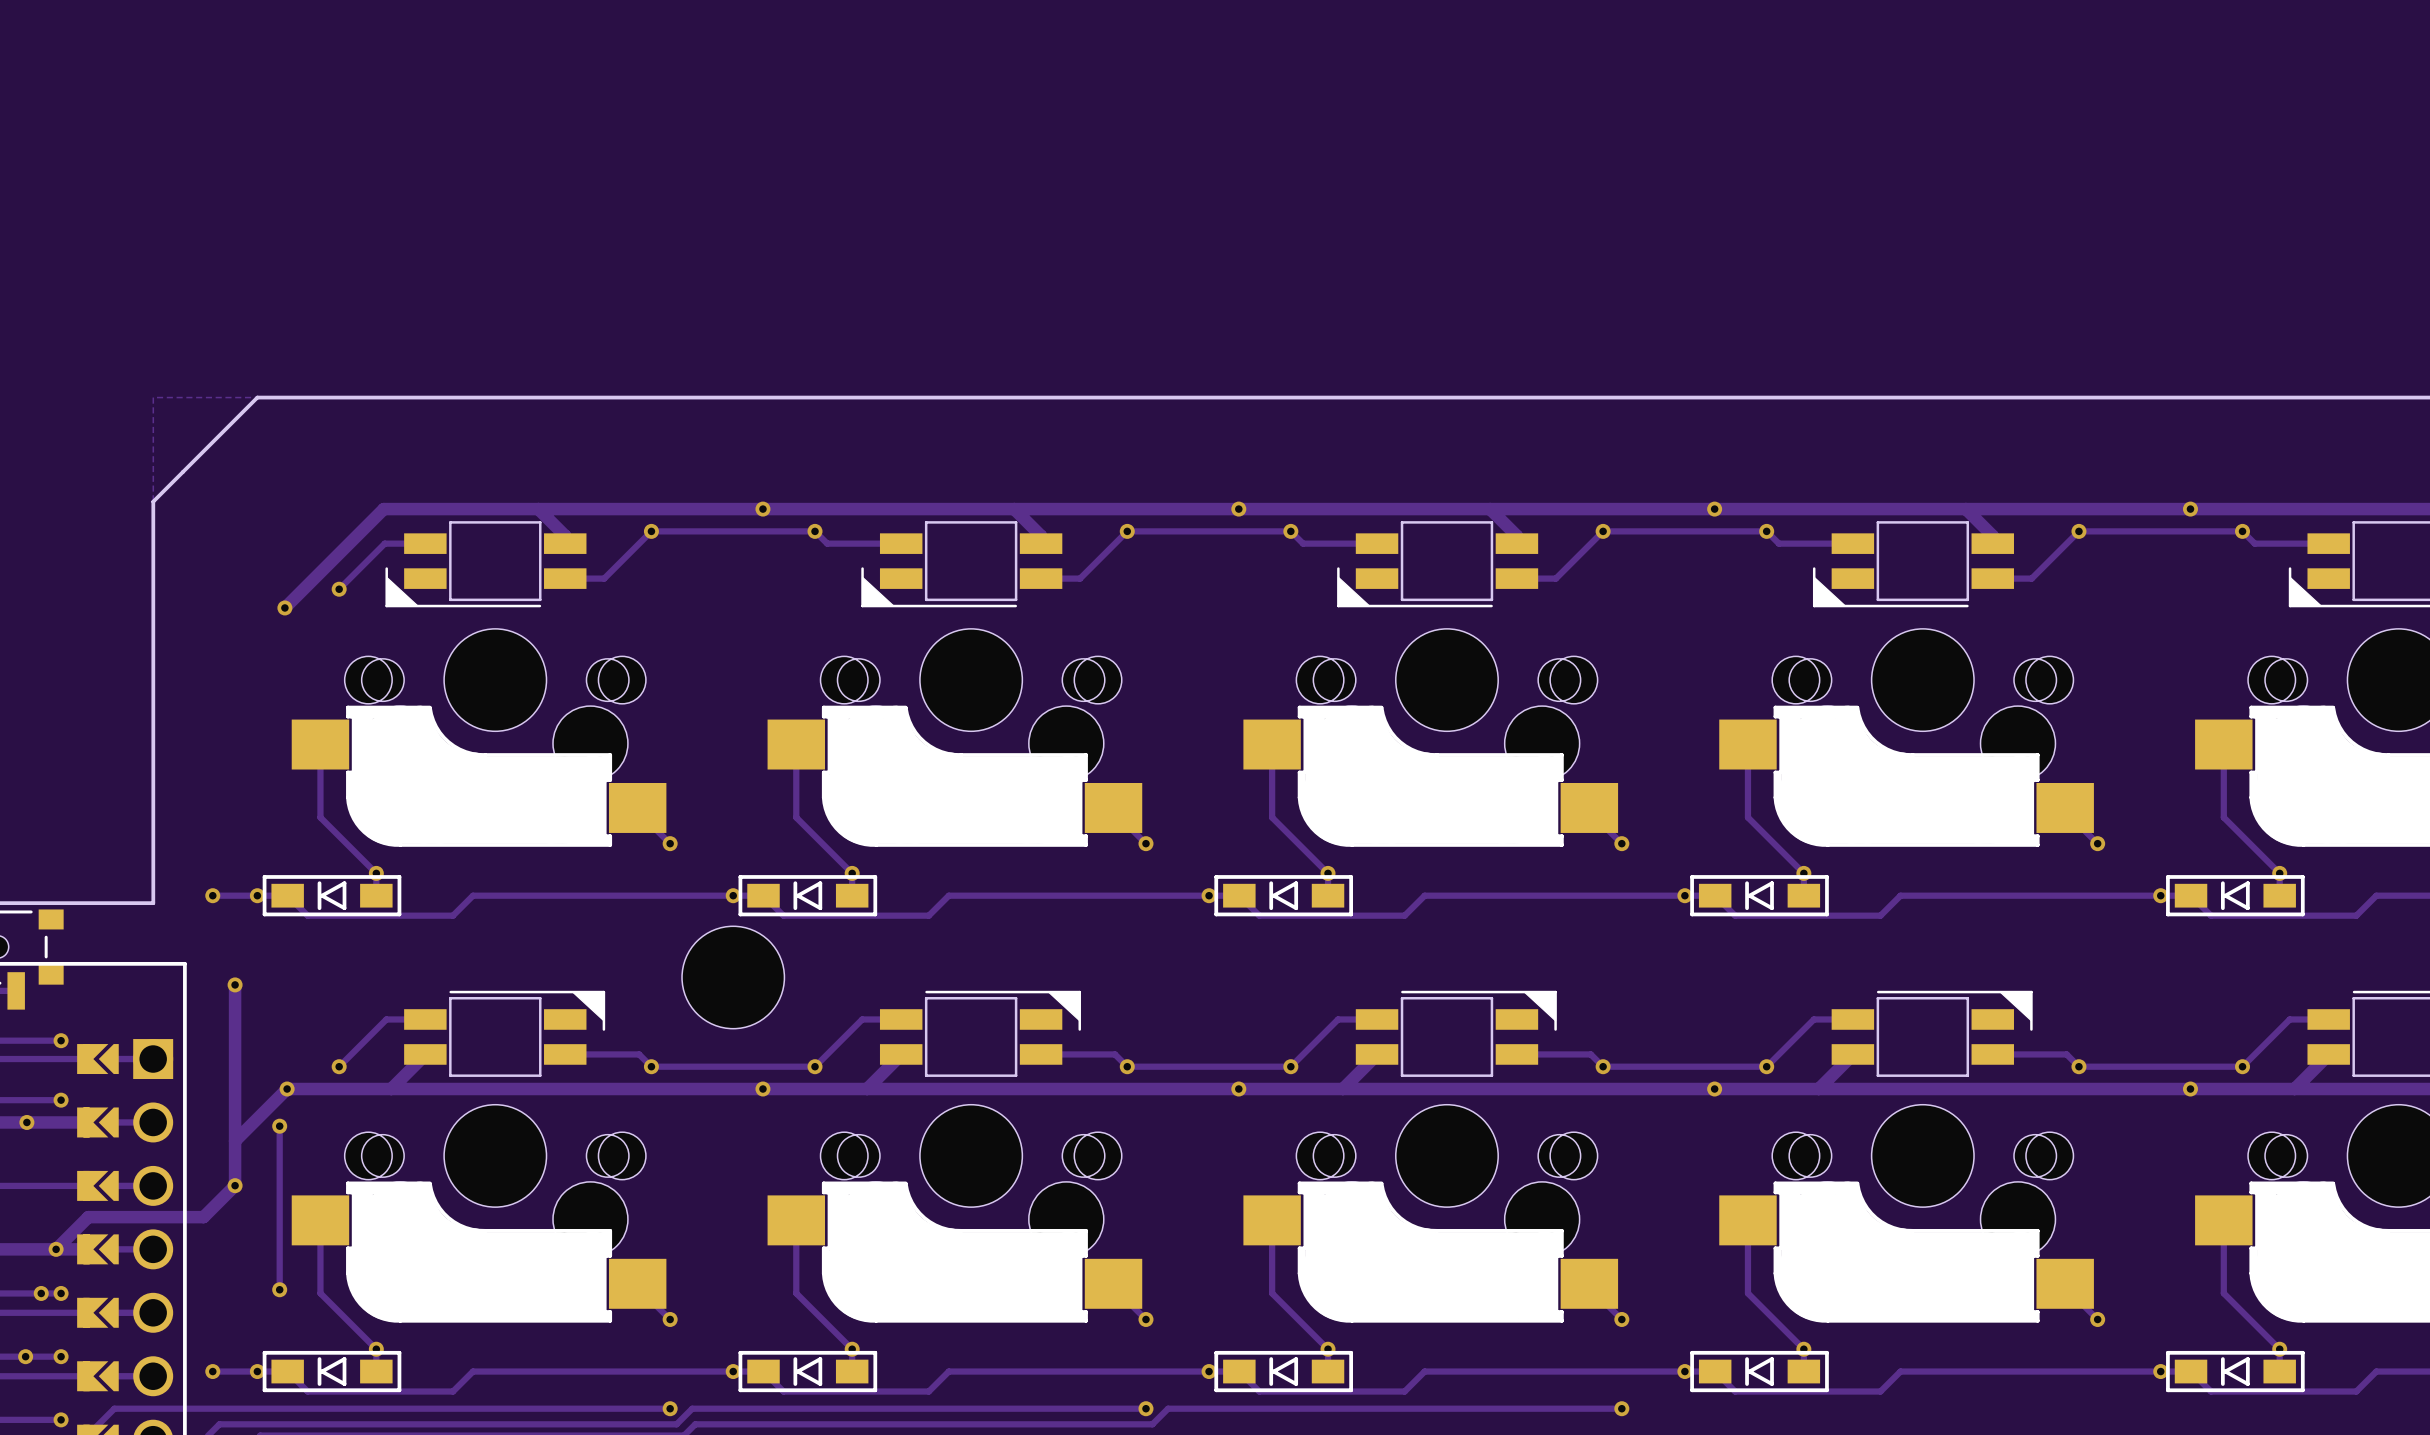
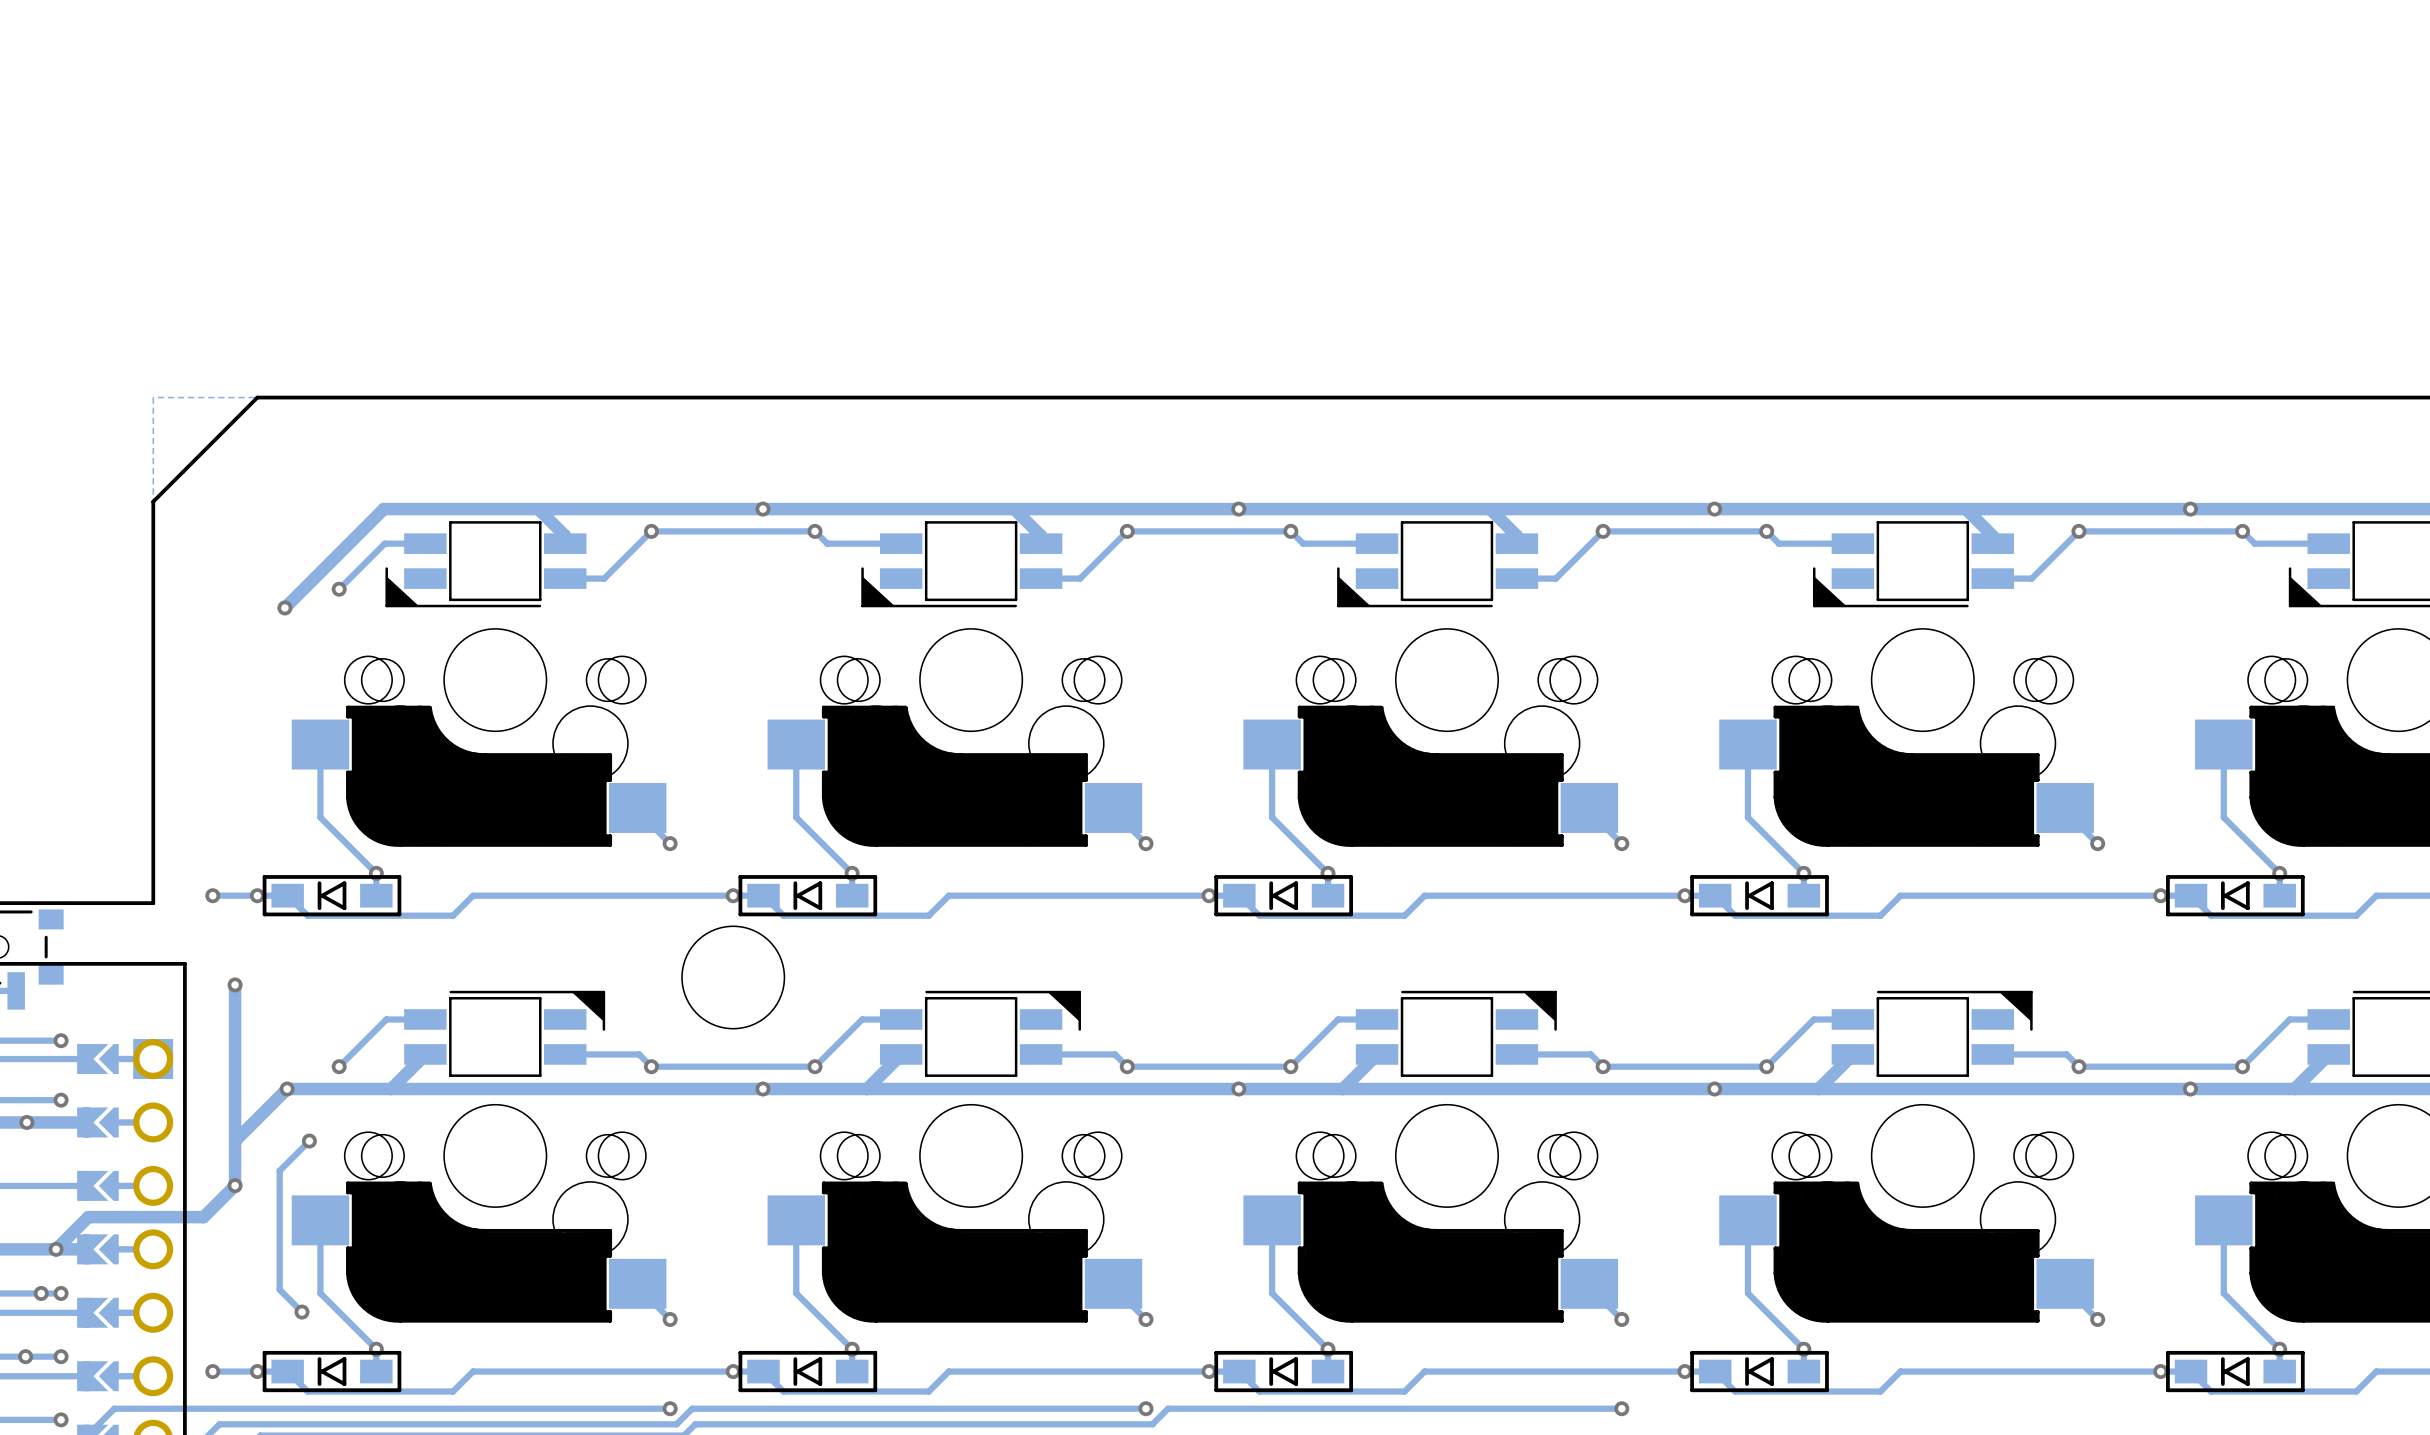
track: (279, 1126) (279, 1170) -> (309, 1141) (279, 1170)
via position: (279, 1126) -> (309, 1141)
track: none -> (279, 1289) (301, 1312)
via position: (279, 1289) -> (301, 1312)

